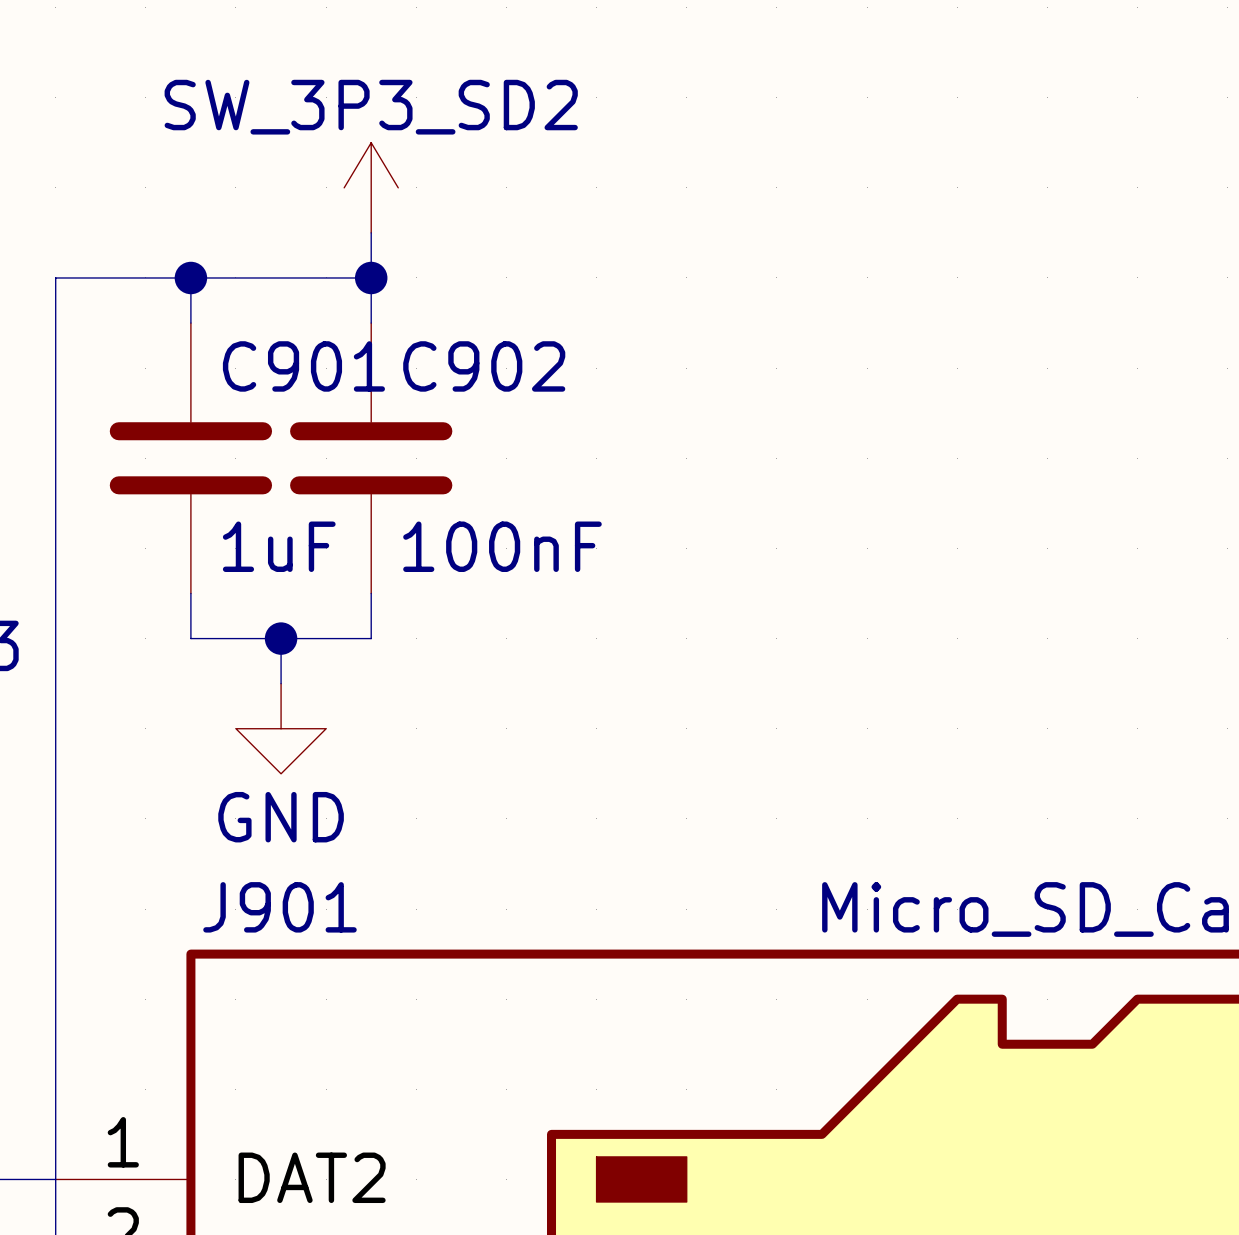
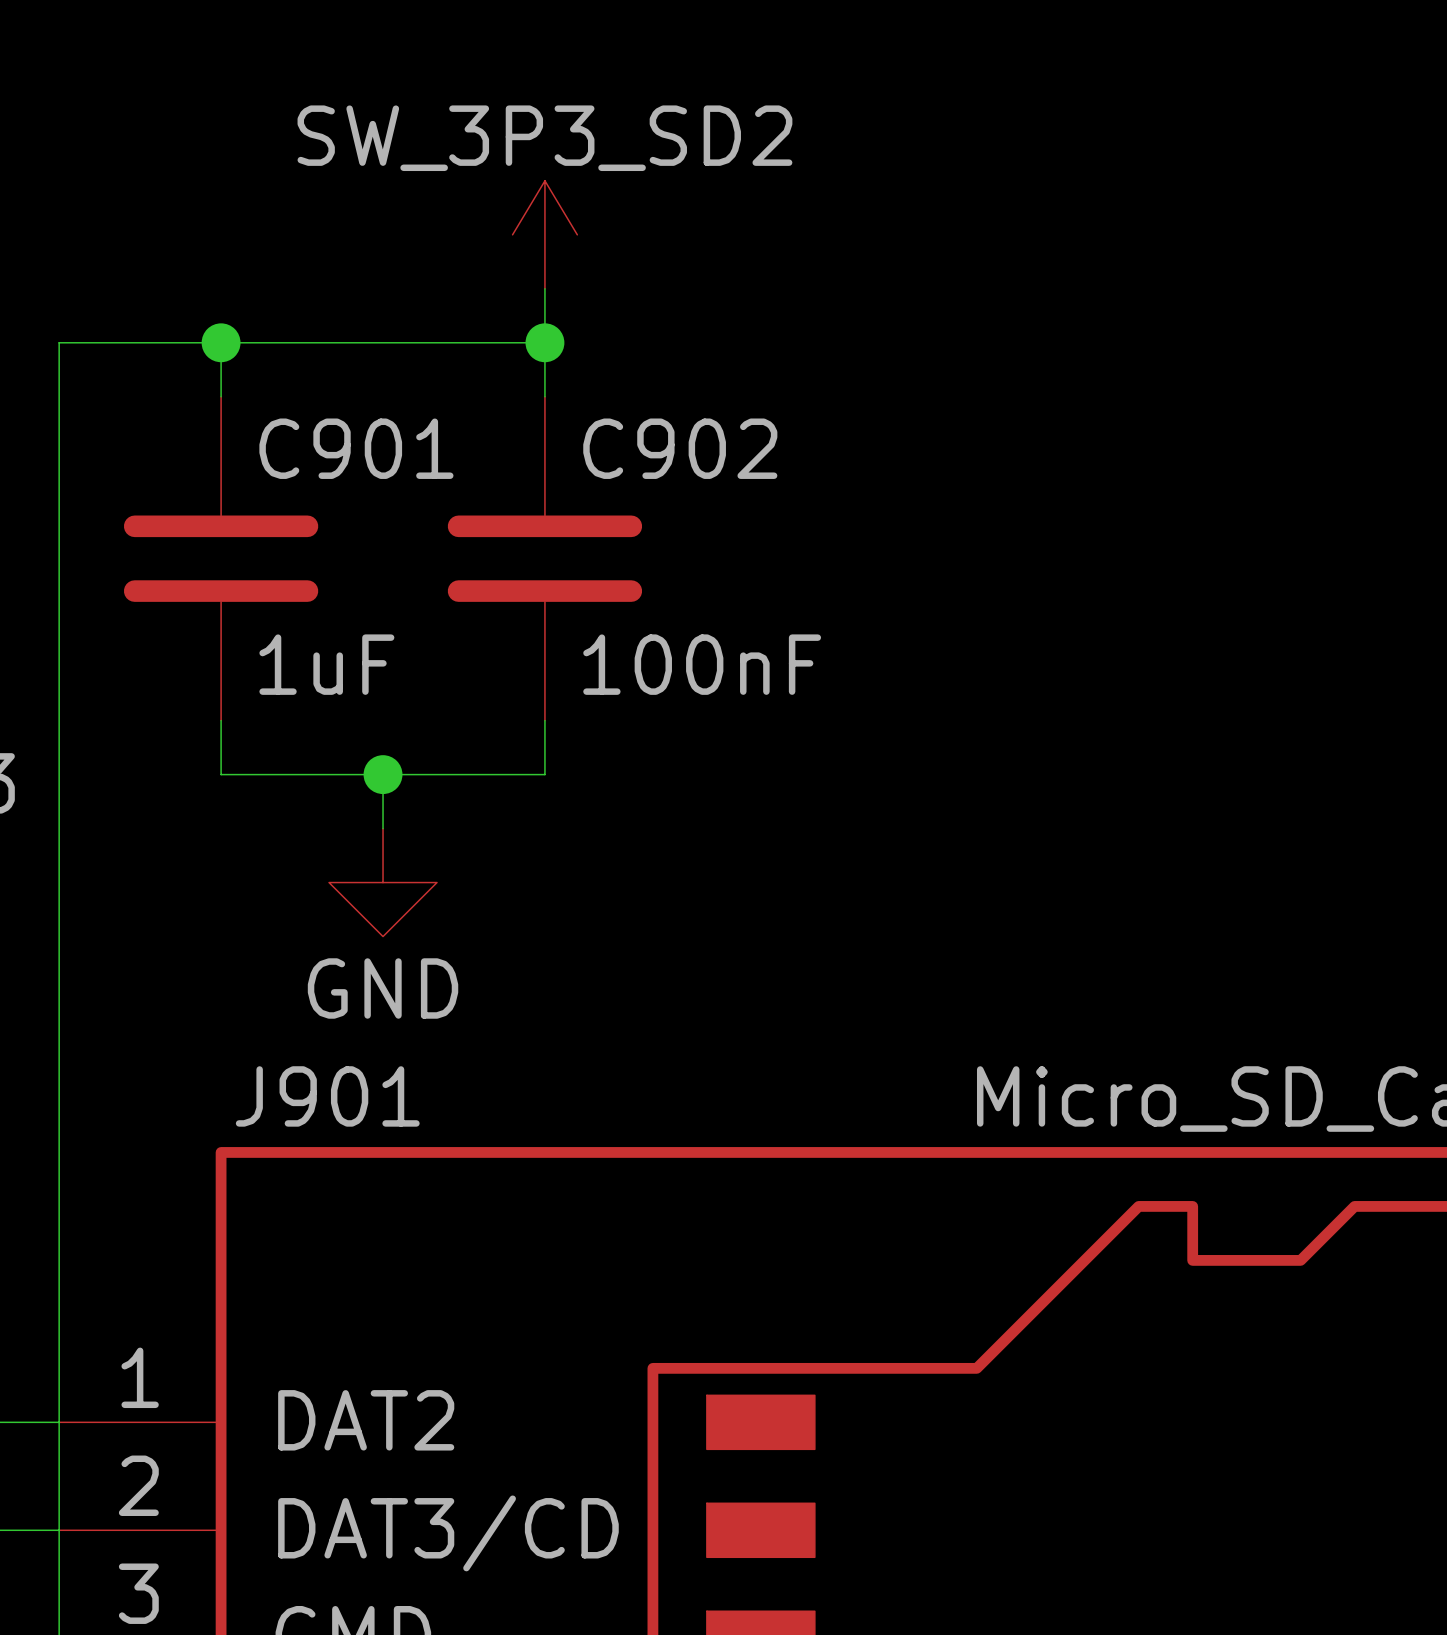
power symbol position: SW_3P3_SD2 (371, 187) -> SW_3P3_SD2 (544, 234)
wire: (371, 232) (371, 323) -> (544, 288) (544, 396)
wire: none -> (437, 342) (544, 342)
junction position: (371, 277) -> (544, 342)
C902 position: (371, 458) -> (544, 558)
wire: (371, 593) (371, 638) -> (544, 720) (544, 774) (437, 774)
wire: (281, 638) (281, 683) -> (383, 774) (383, 828)
junction position: (281, 638) -> (383, 774)
power symbol position: GND (281, 728) -> GND (383, 882)

